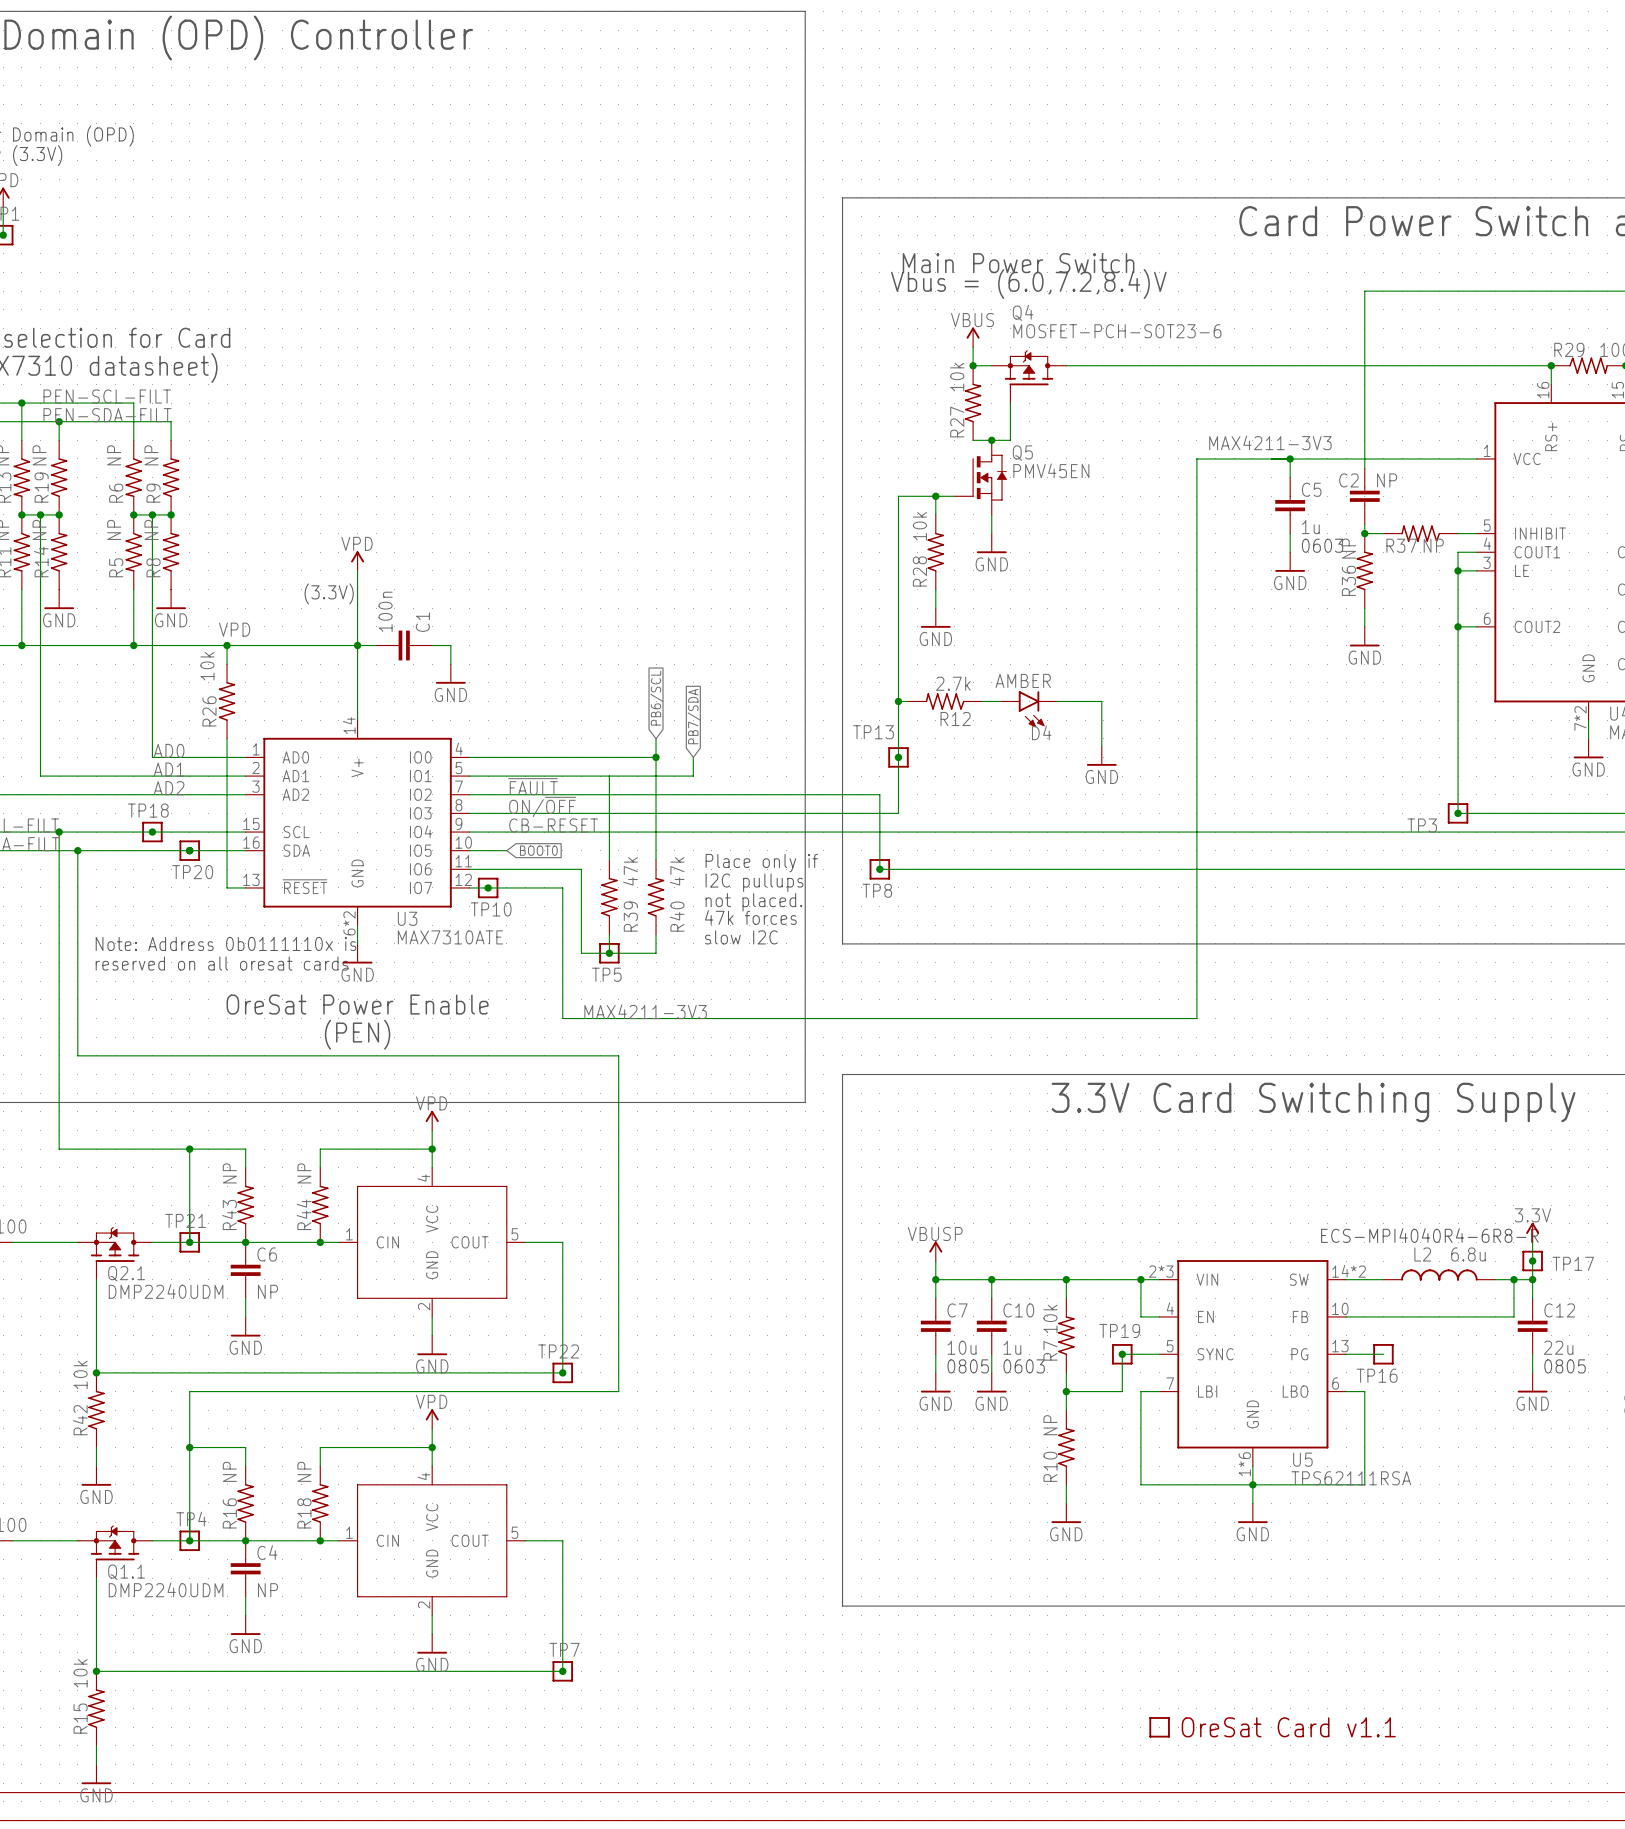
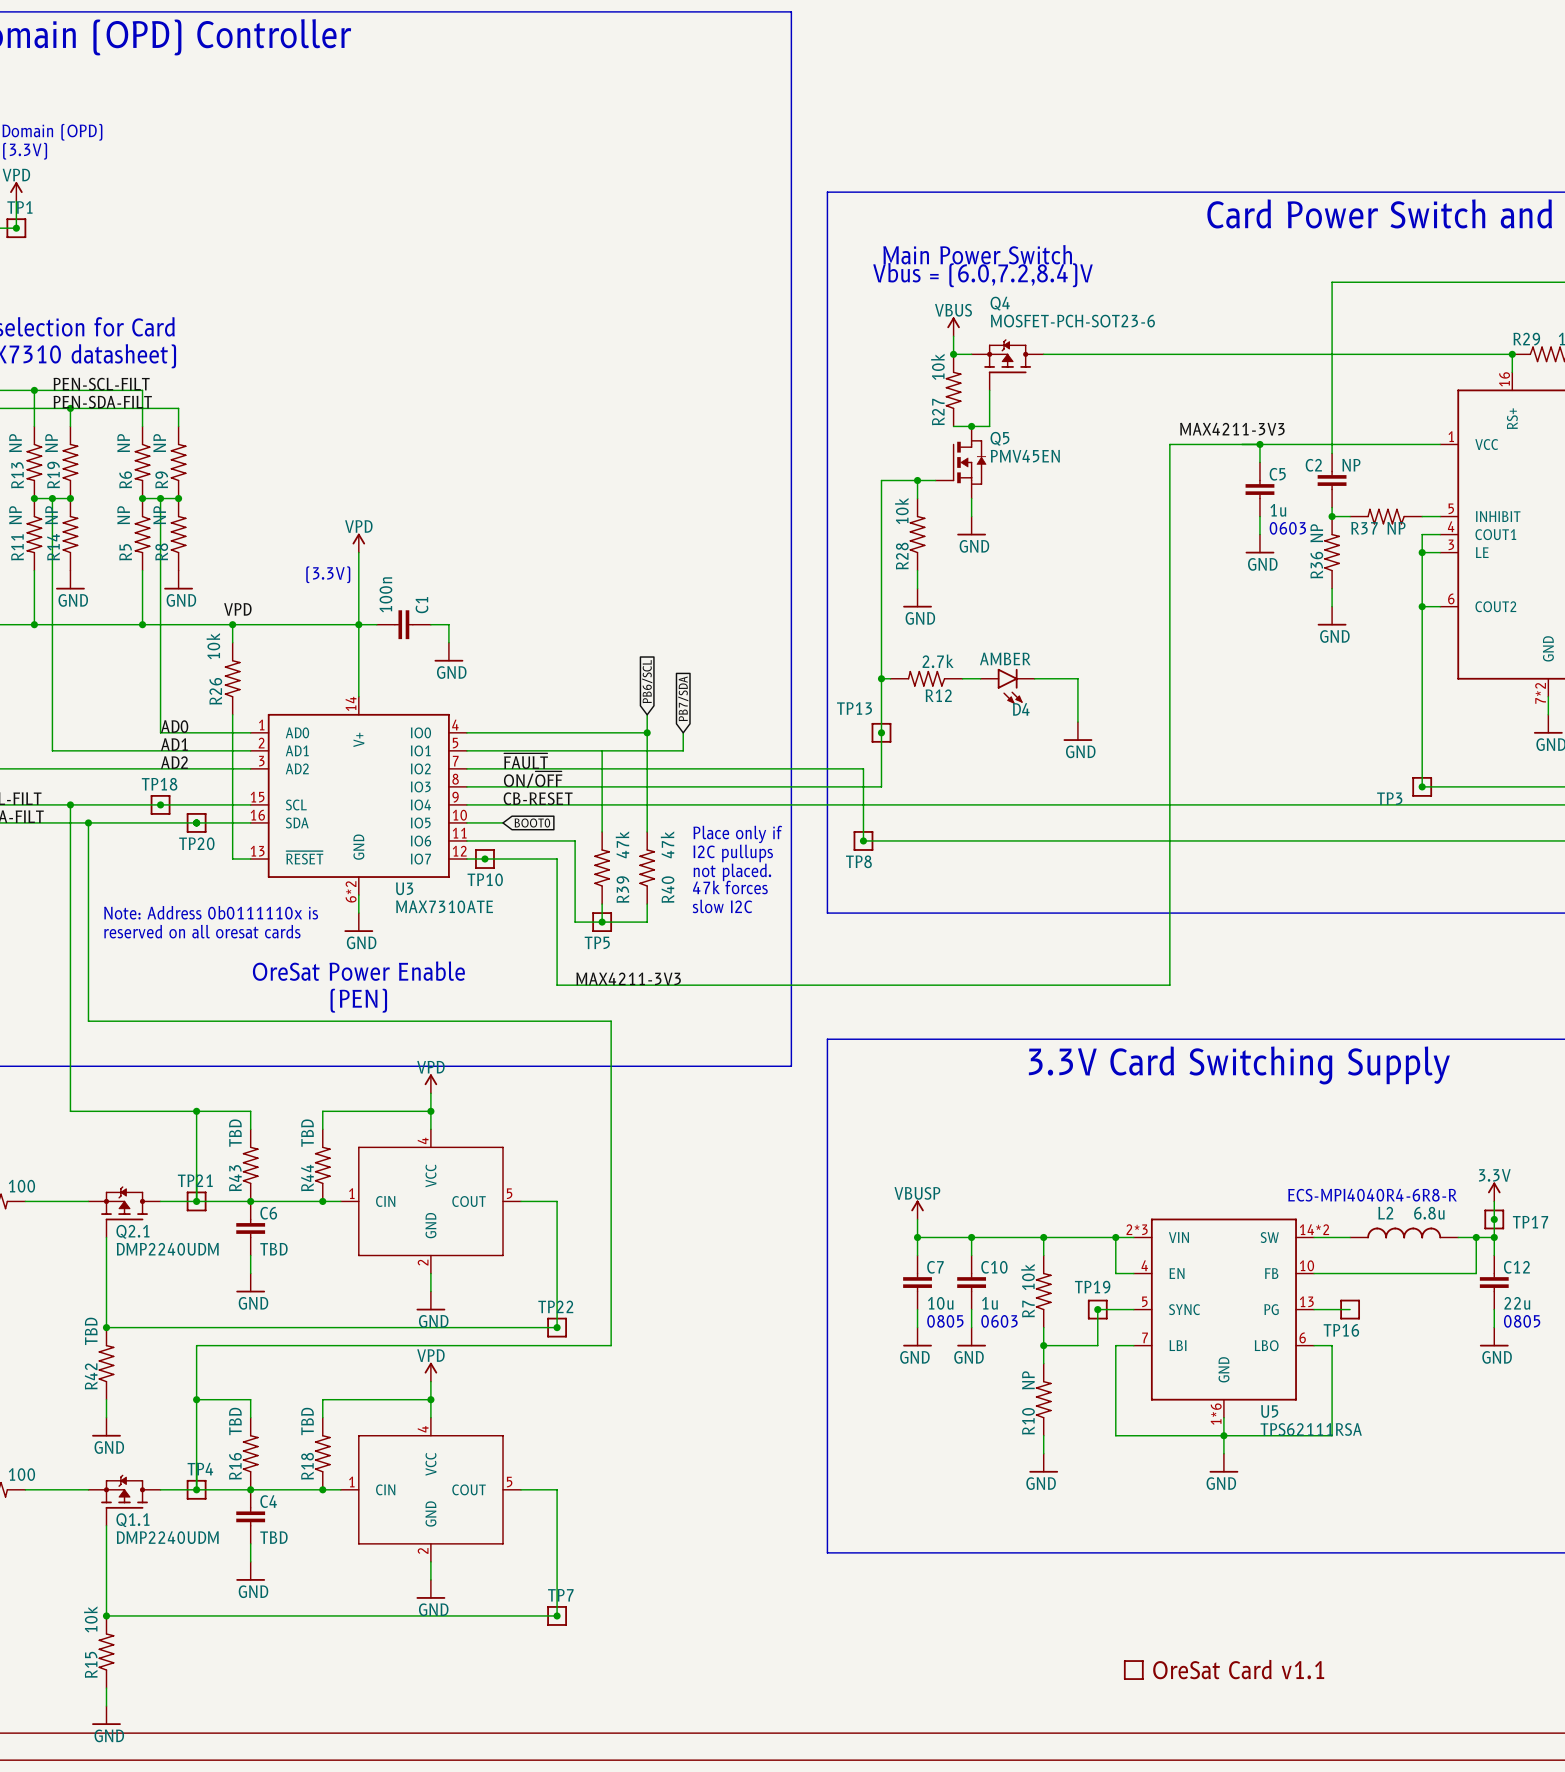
R43 value: NP (229, 1173) -> TBD (235, 1133)
R44 value: NP (304, 1173) -> TBD (307, 1133)
C6 value: NP (267, 1291) -> TBD (273, 1249)
R42 value: 10k (80, 1374) -> TBD (91, 1331)
R16 value: NP (229, 1471) -> TBD (235, 1421)
R18 value: NP (304, 1471) -> TBD (307, 1421)
C4 value: NP (267, 1590) -> TBD (273, 1537)

